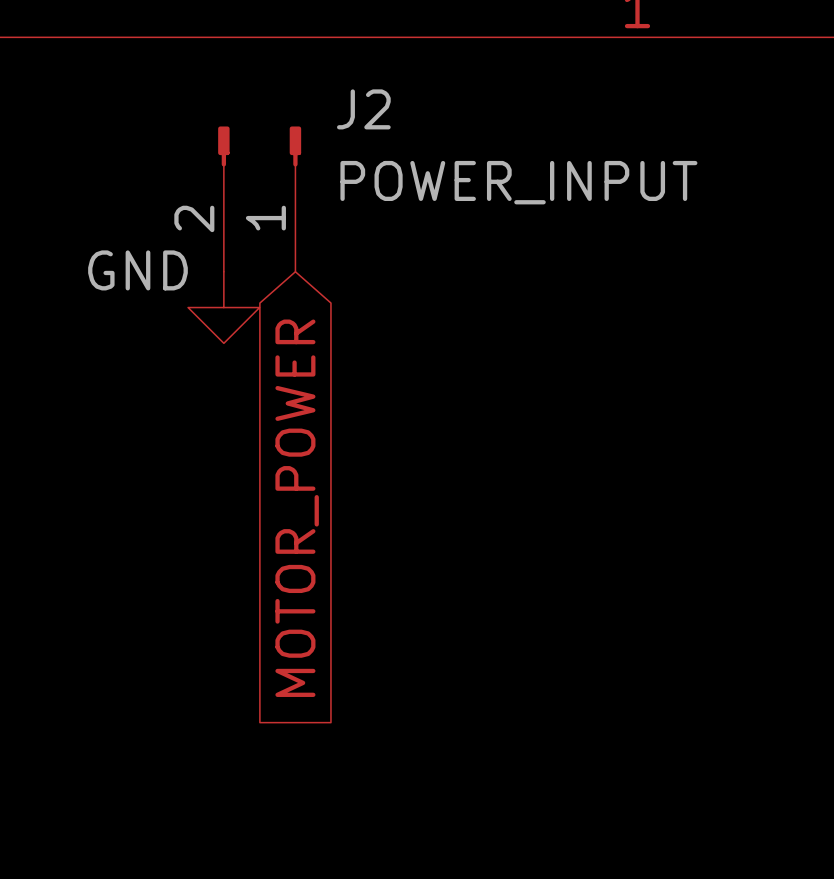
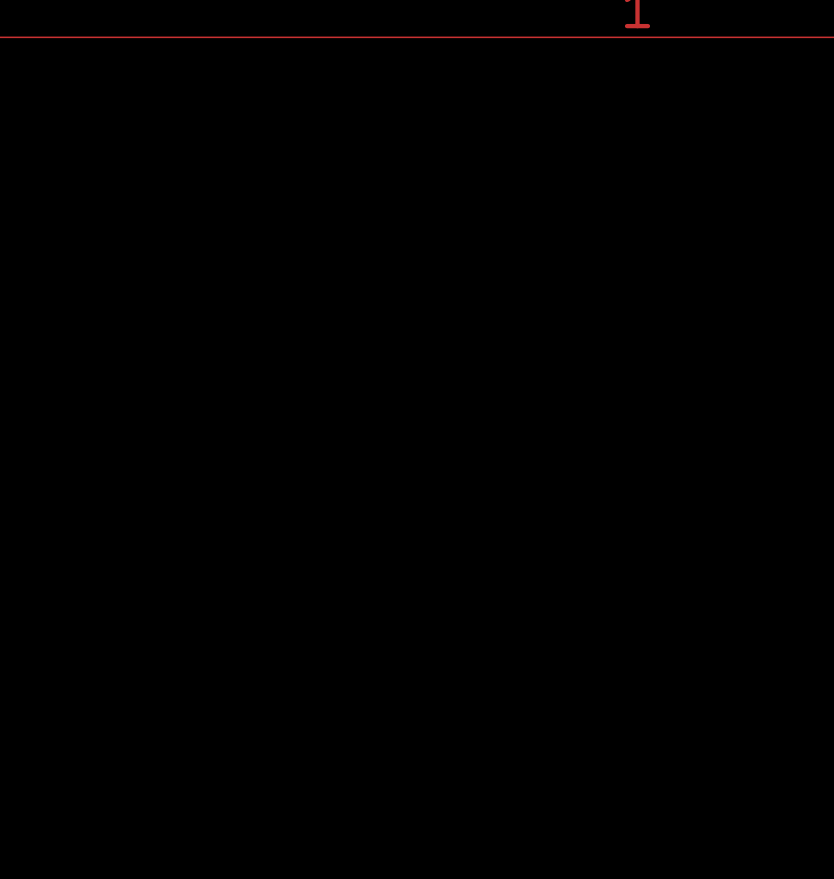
J2: POWER_INPUT (259, 199) -> none
power symbol: GND (223, 307) -> none
global label: MOTOR_POWER (297, 508) -> none

